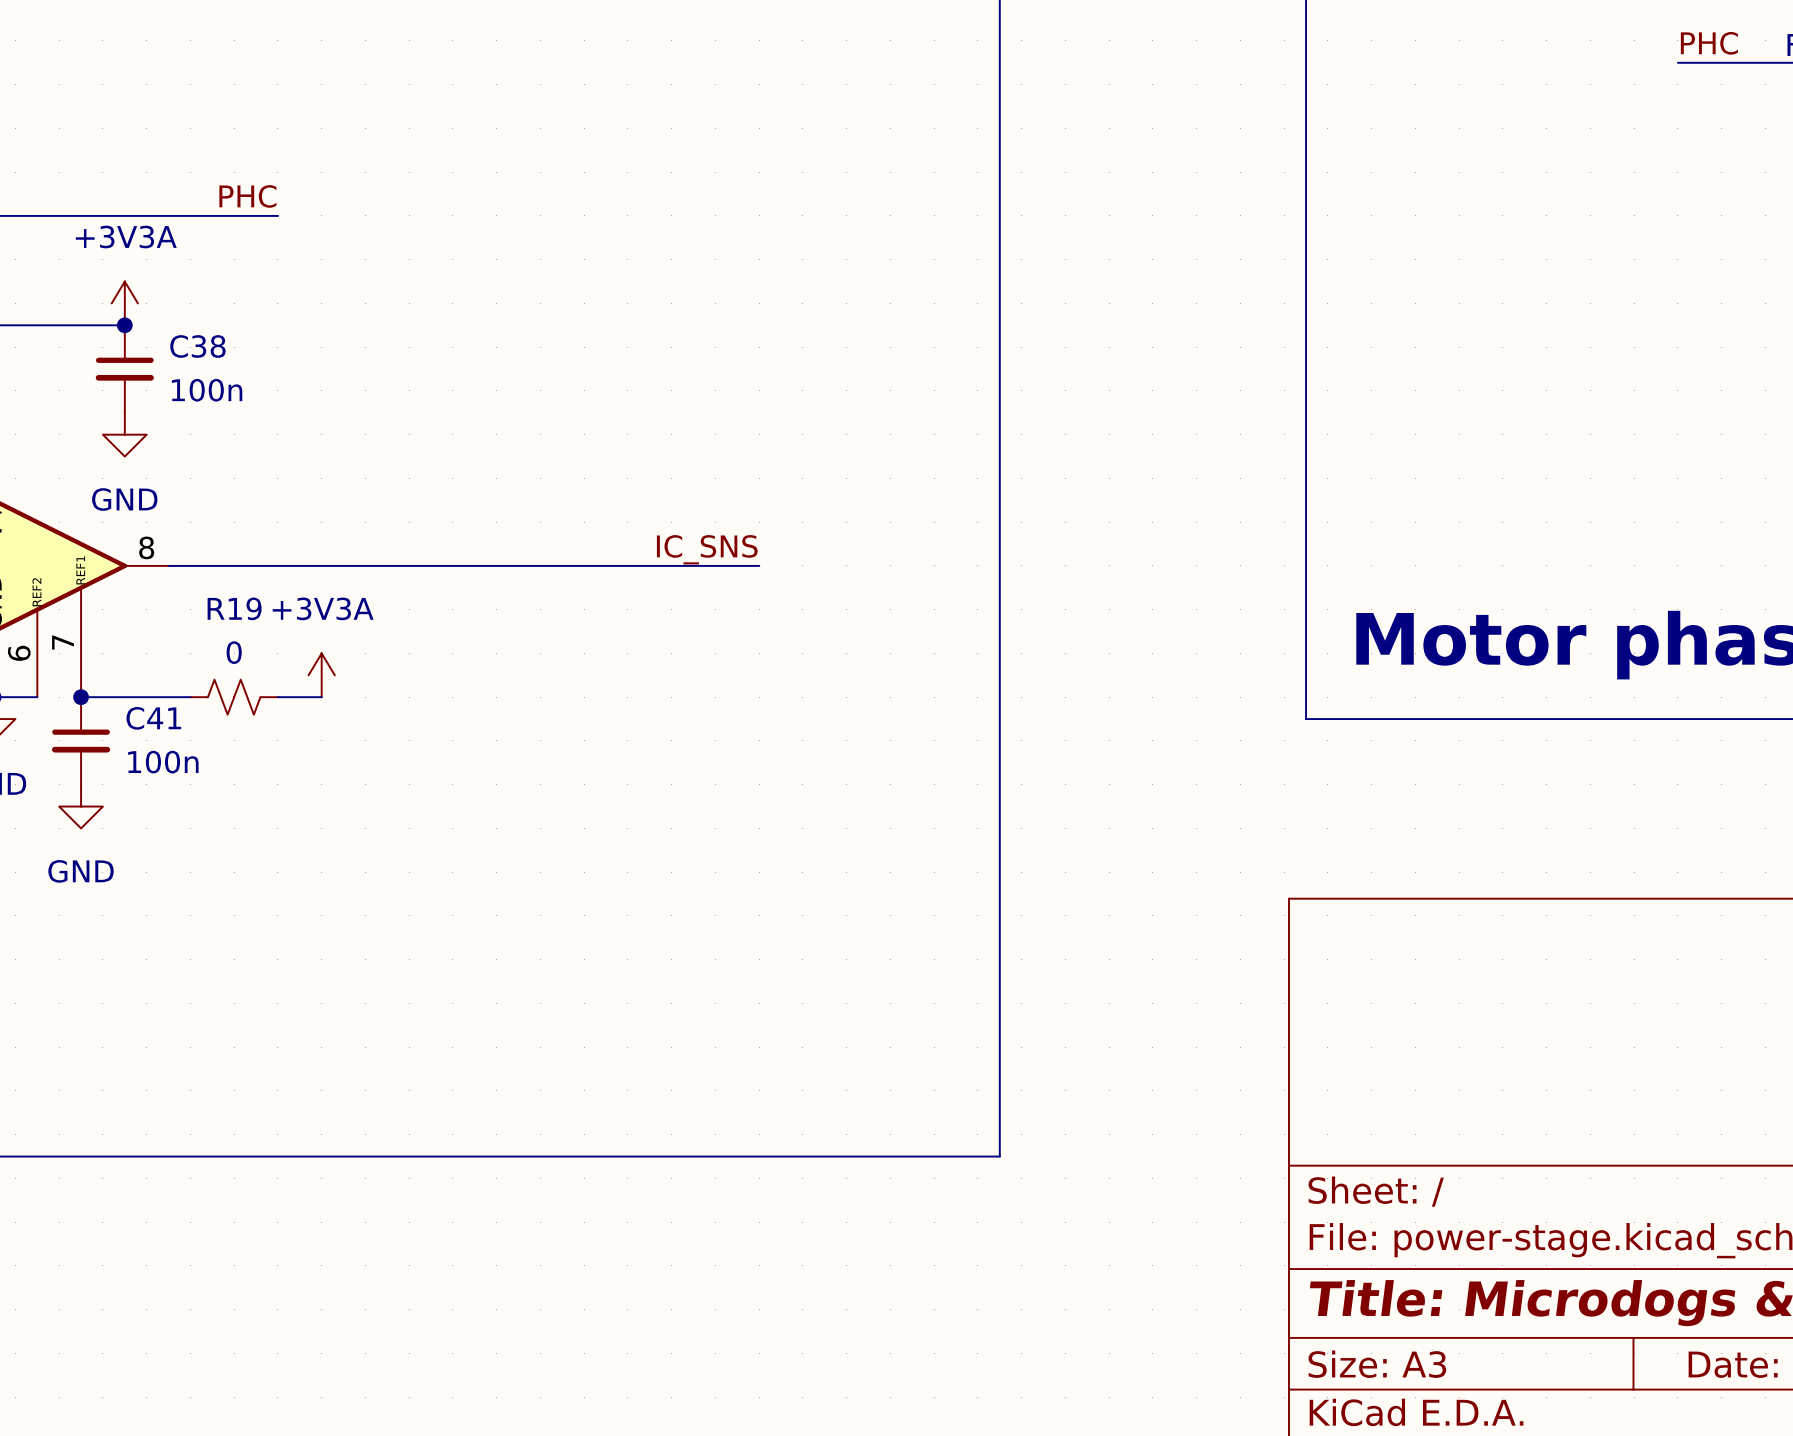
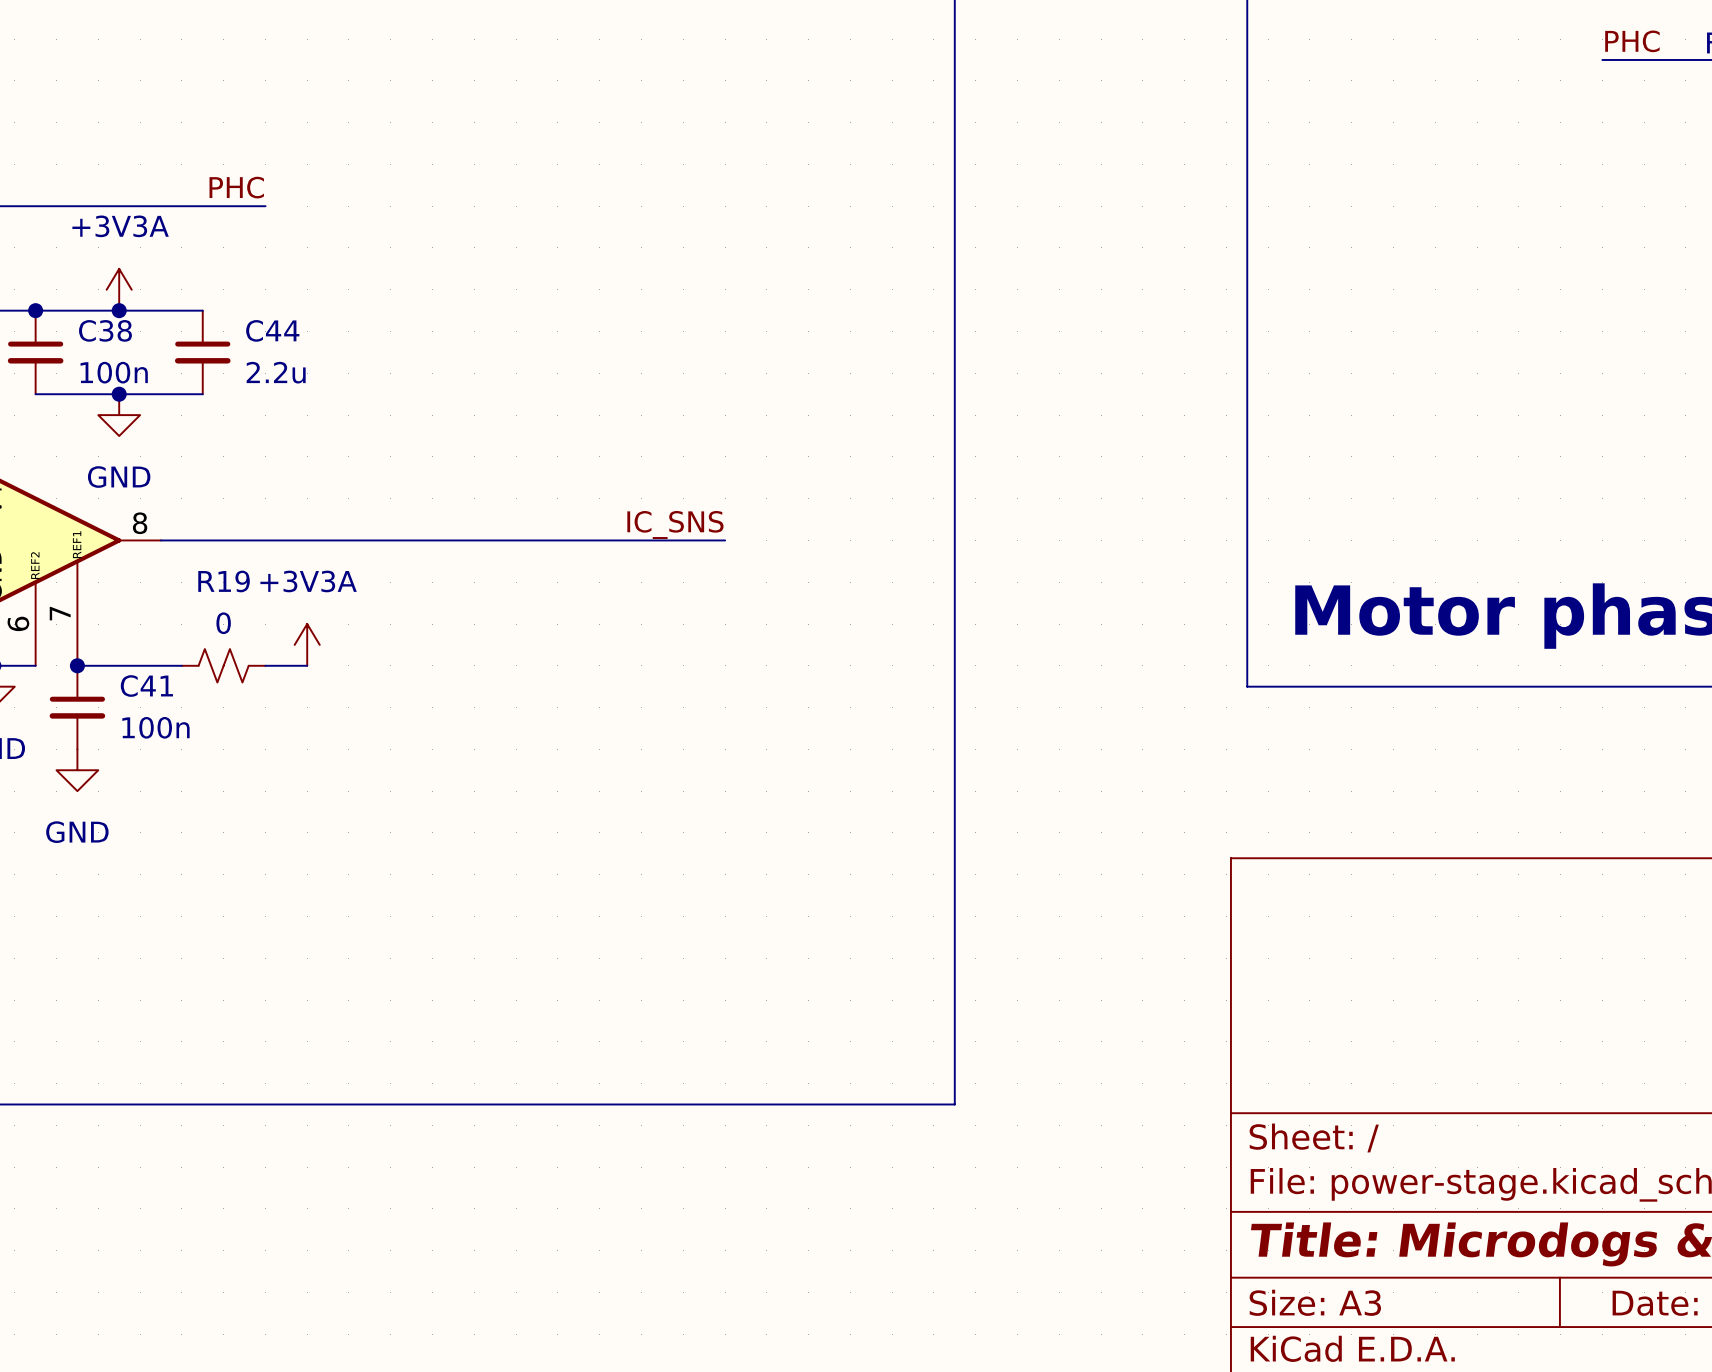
junction: none -> (35, 310)
wire: none -> (119, 310) (202, 310)
C38 position: (124, 369) -> (35, 352)
C44: none -> 2.2u (202, 352)
wire: none -> (35, 394) (202, 394)
junction: none -> (119, 394)

